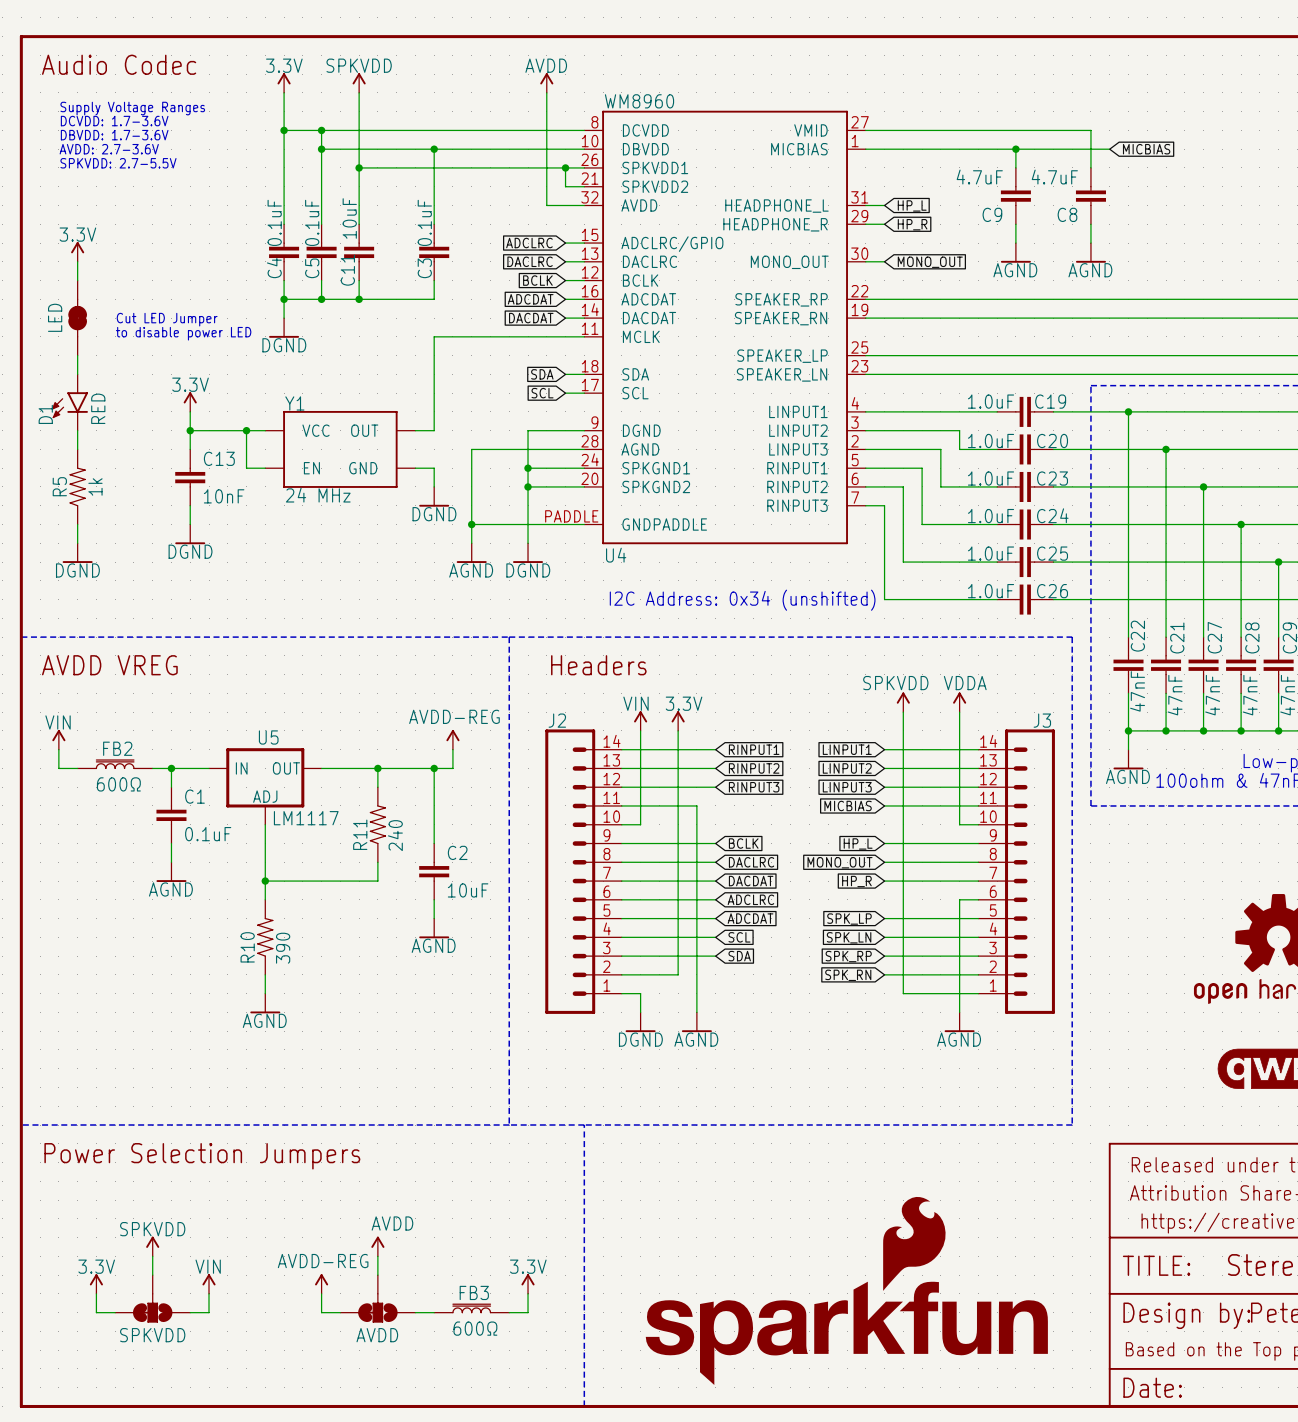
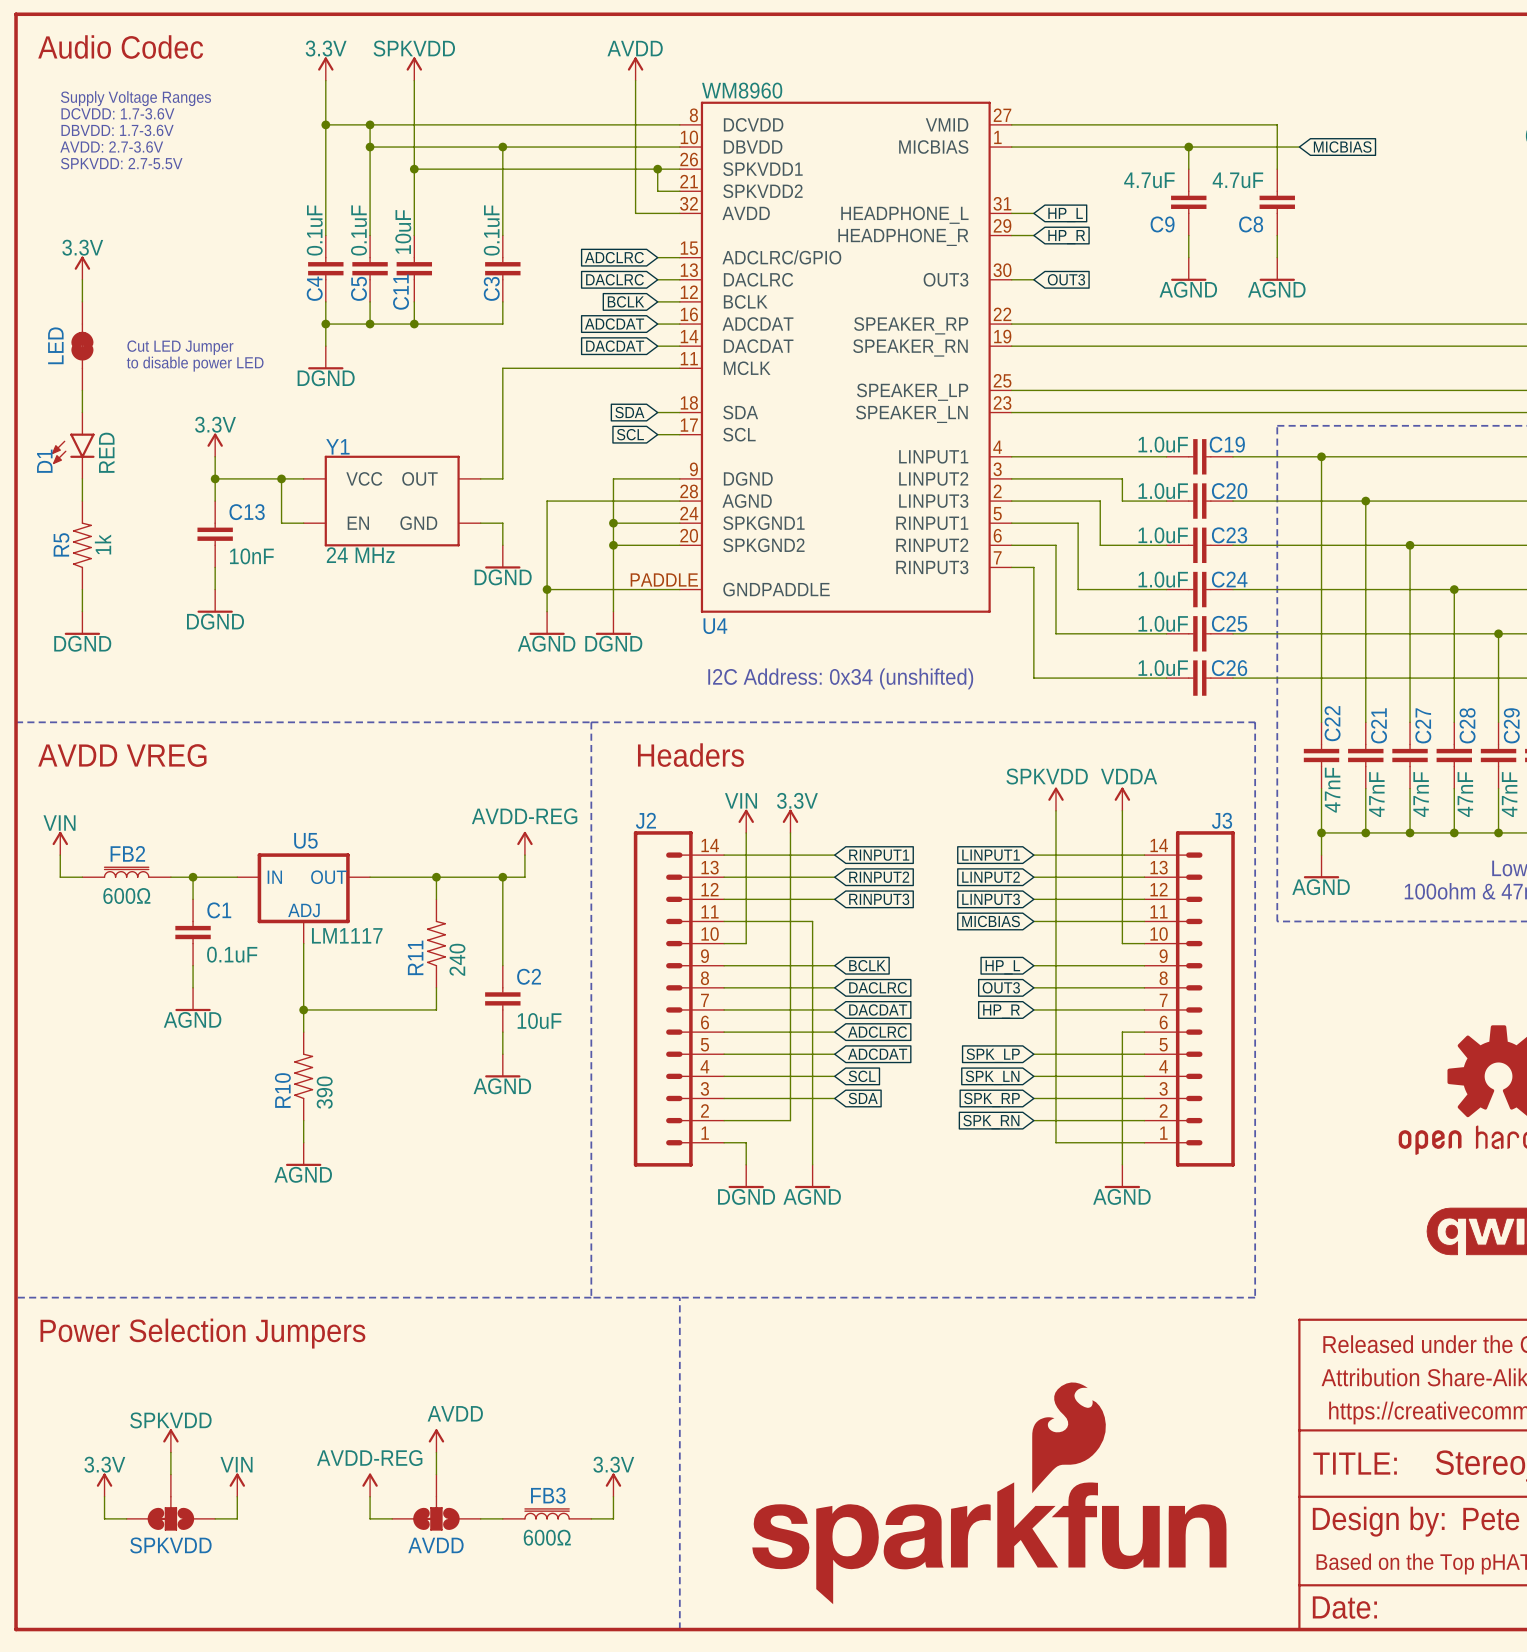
U4 pin name: MONO_OUT (789, 262) -> OUT3 (946, 279)
global label: MONO_OUT (930, 262) -> OUT3 (1066, 279)
global label: MONO_OUT (840, 862) -> OUT3 (1001, 987)

